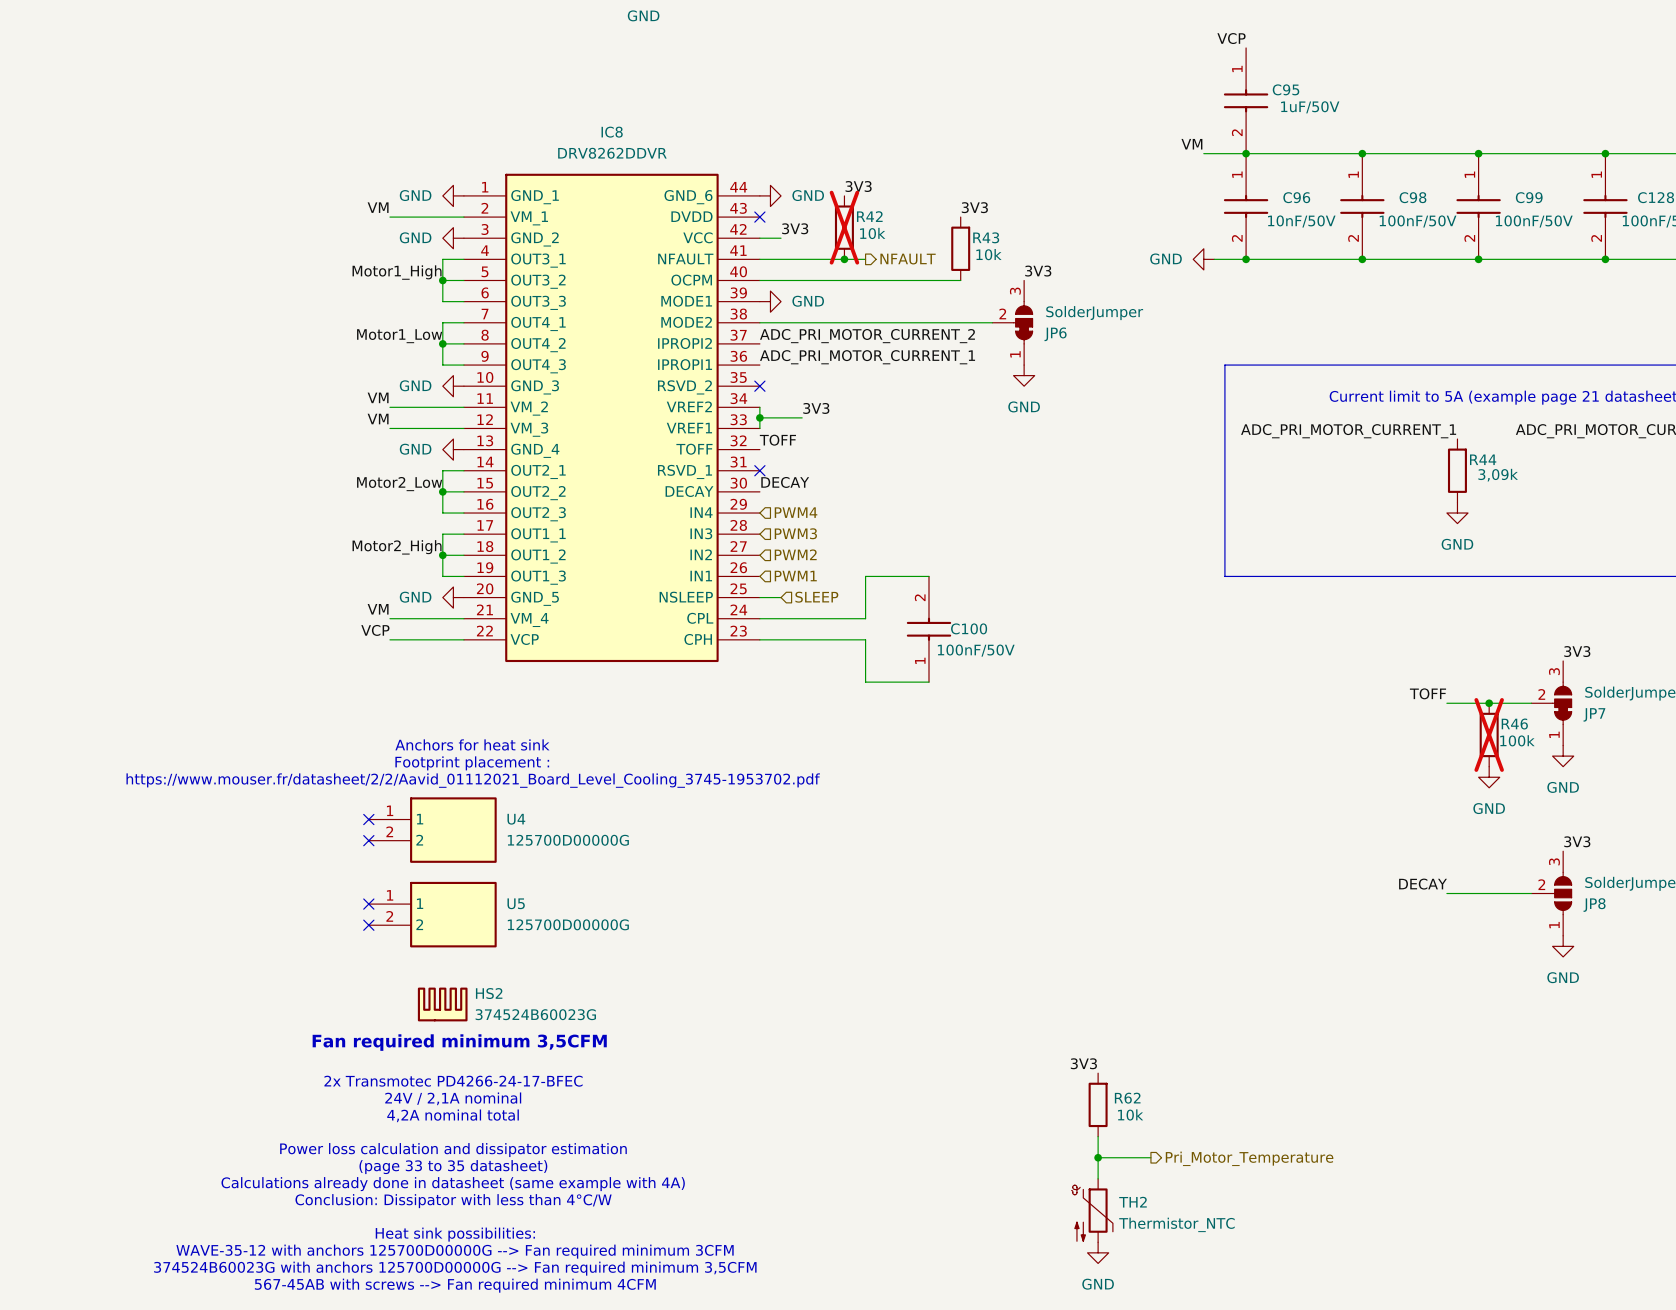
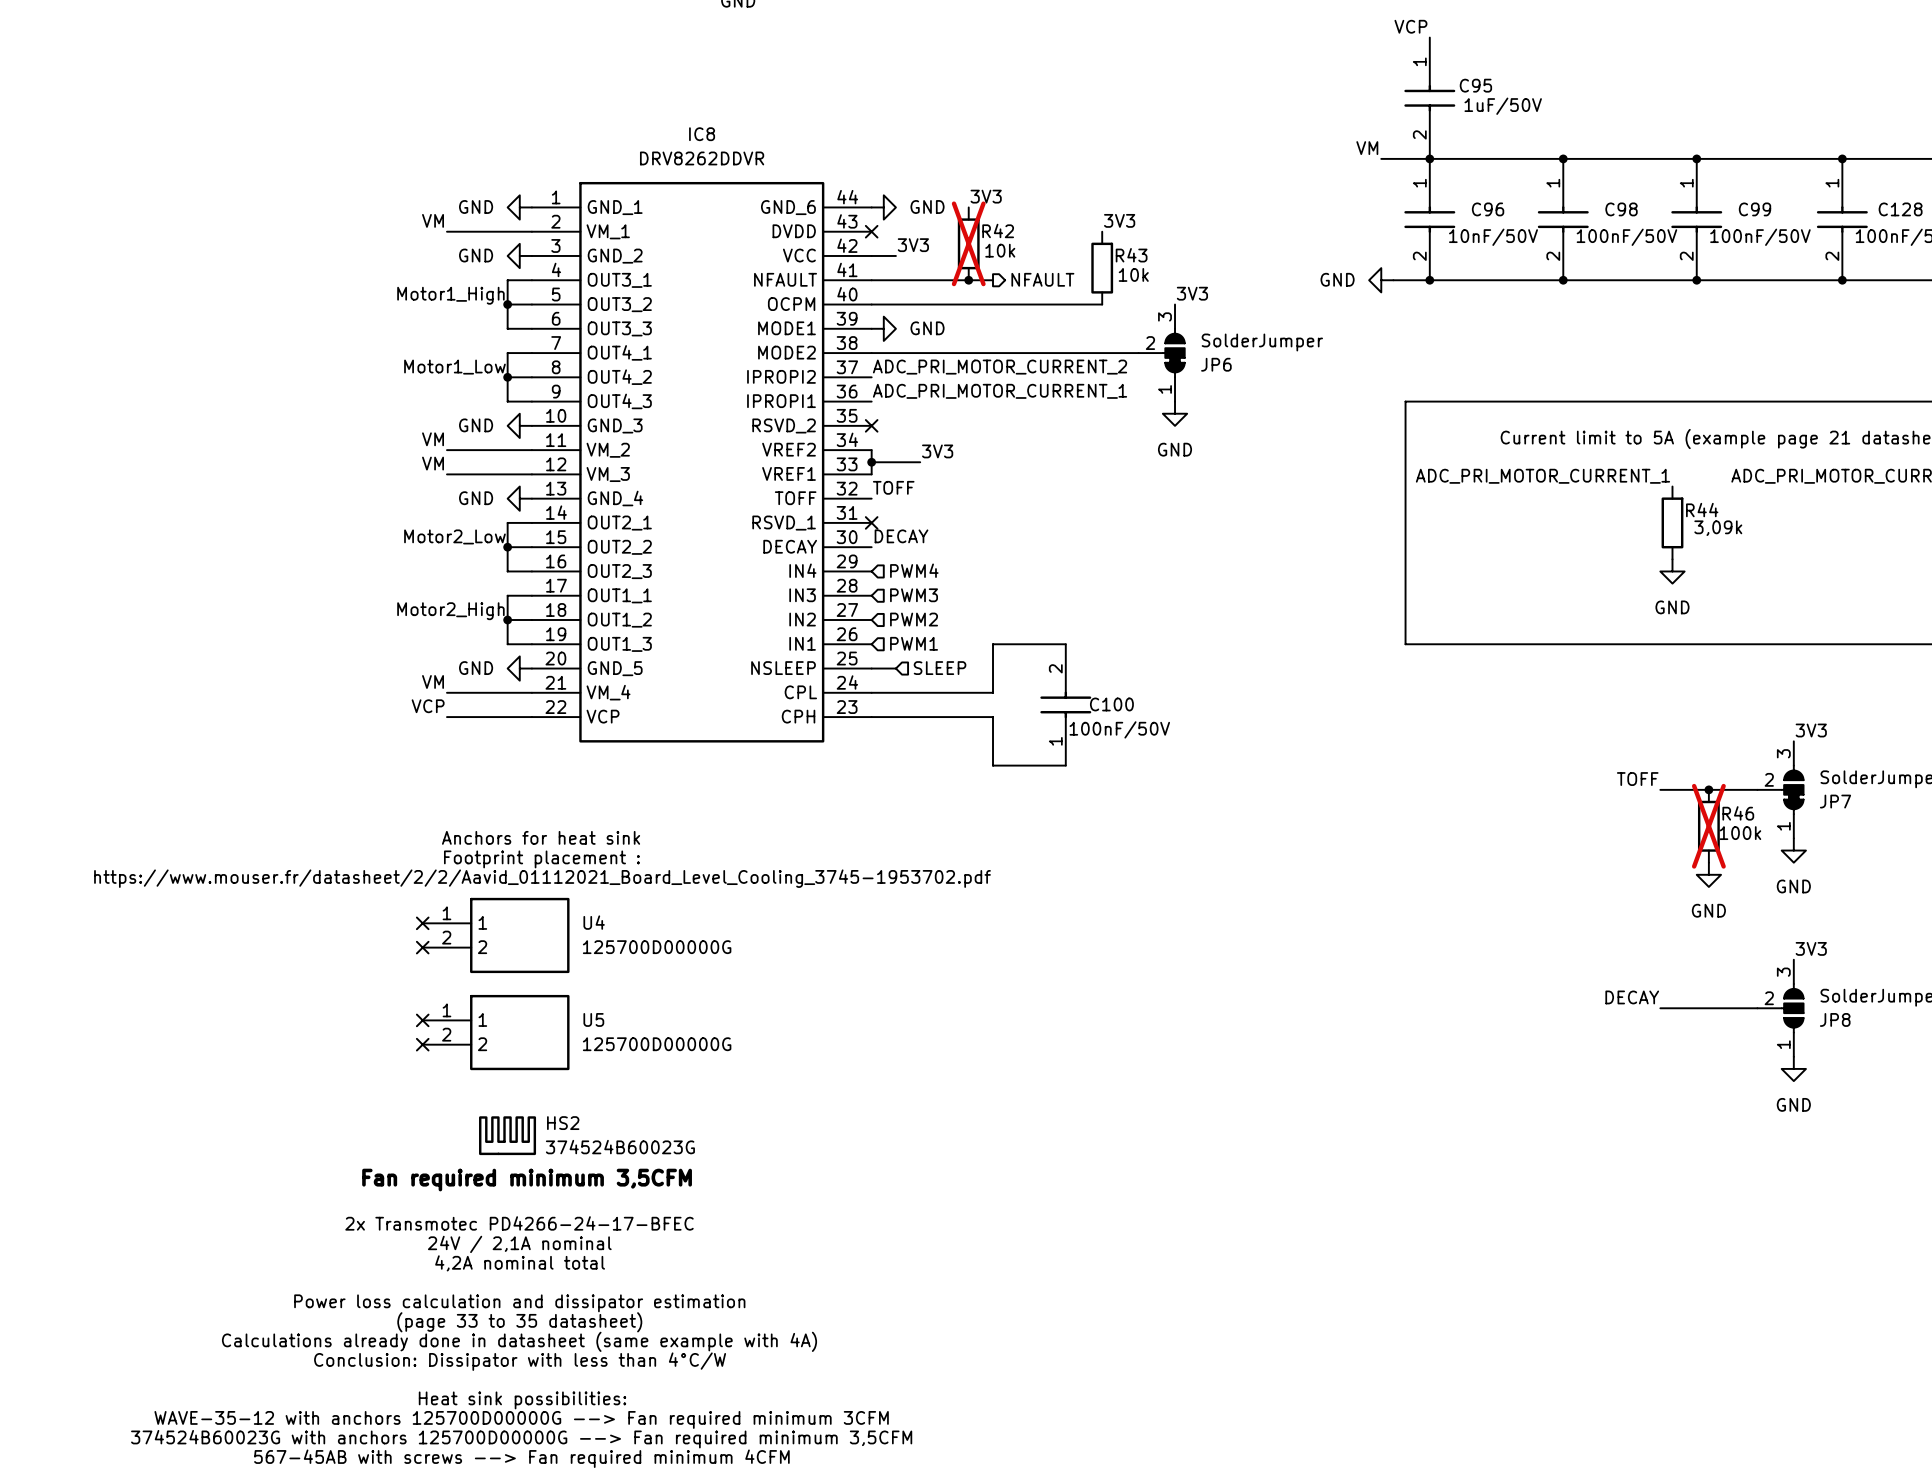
label: 3V3 (1083, 1063) -> none
R62: 10k (1098, 1104) -> none
wire: (1098, 1136) (1098, 1178) -> none
wire: (1098, 1157) (1150, 1157) -> none
junction: (1098, 1157) -> none
hierarchical label: Pri_Motor_Temperature (1249, 1158) -> none
TH2: Thermistor_NTC (1092, 1210) -> none
power symbol: GND (1098, 1252) -> none

